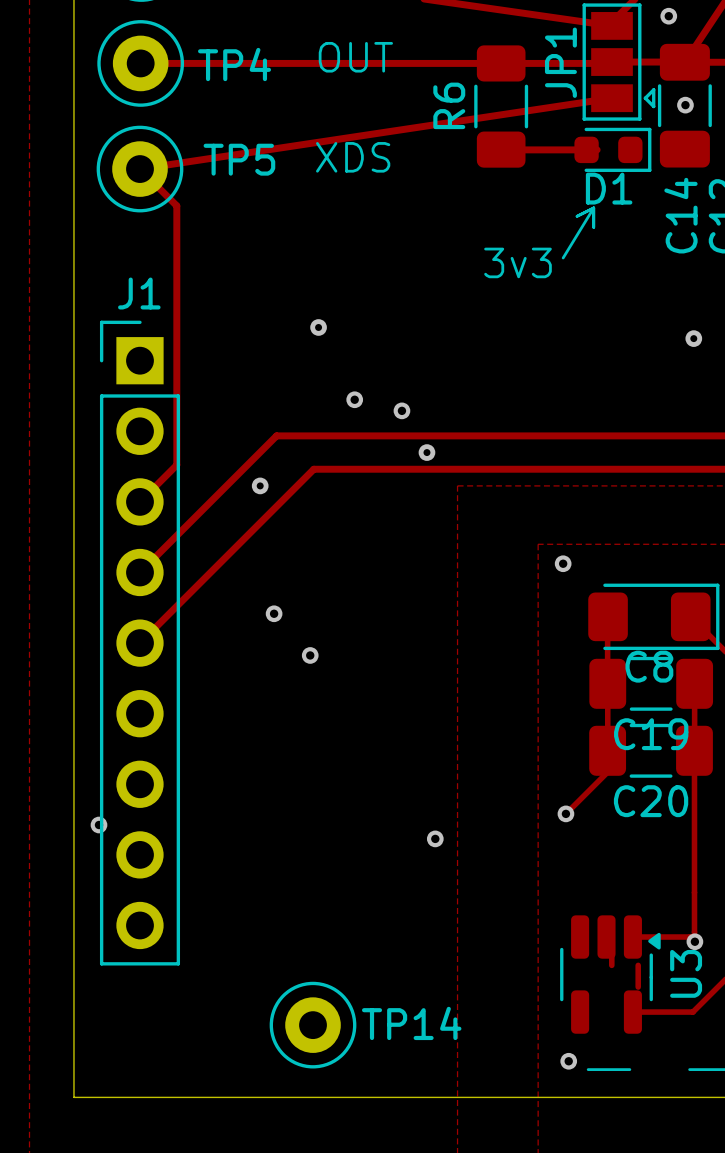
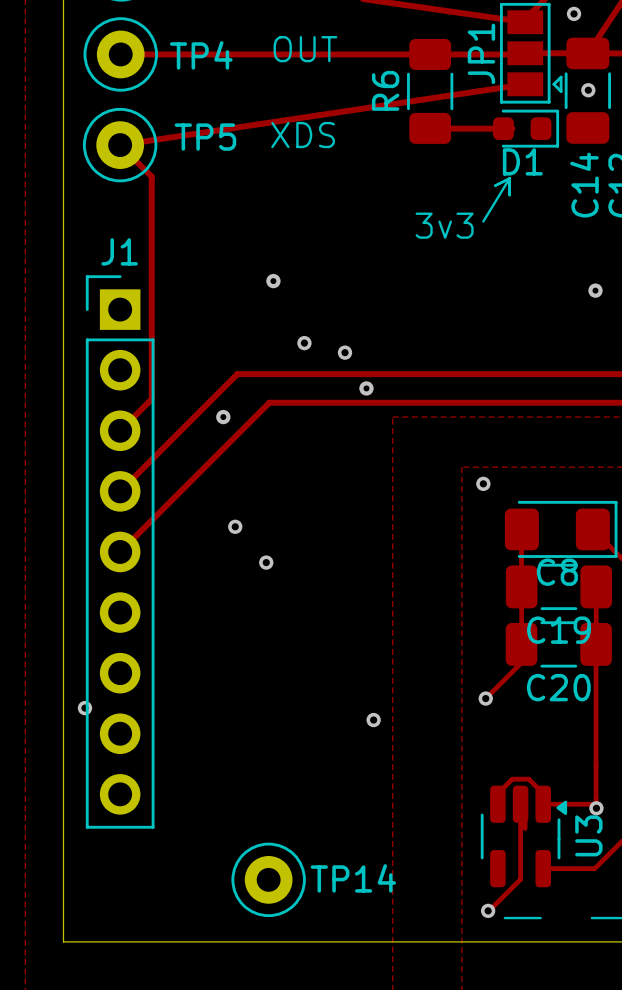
track: none -> (497, 804) (497, 793) (512, 779) (528, 779) (543, 793) (543, 804)
track: none -> (520, 804) (520, 879) (488, 910)
track: (638, 965) (638, 987) -> none

